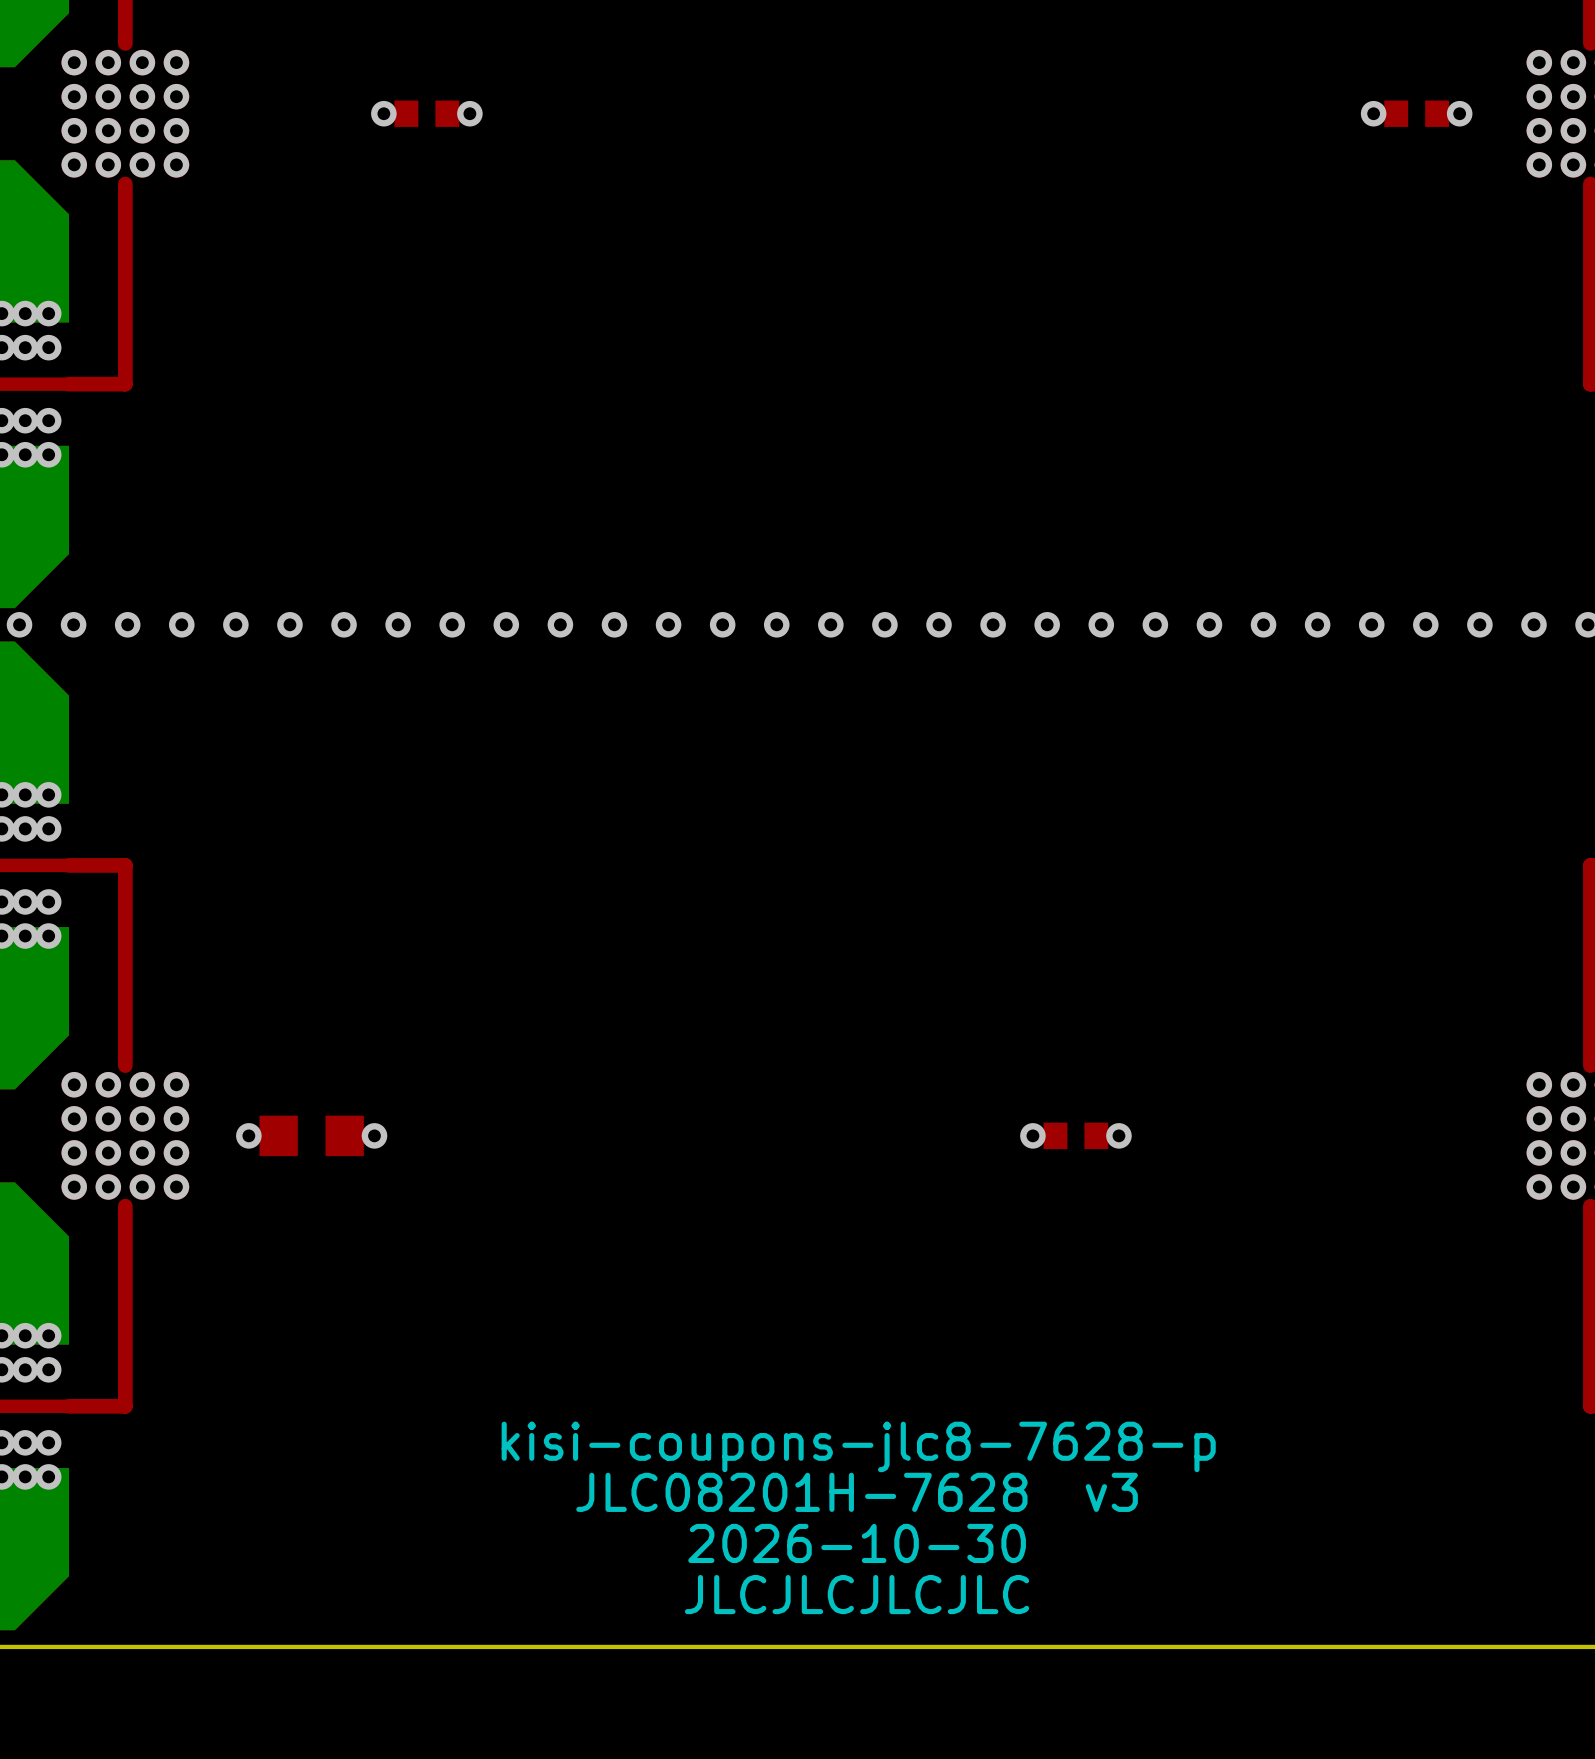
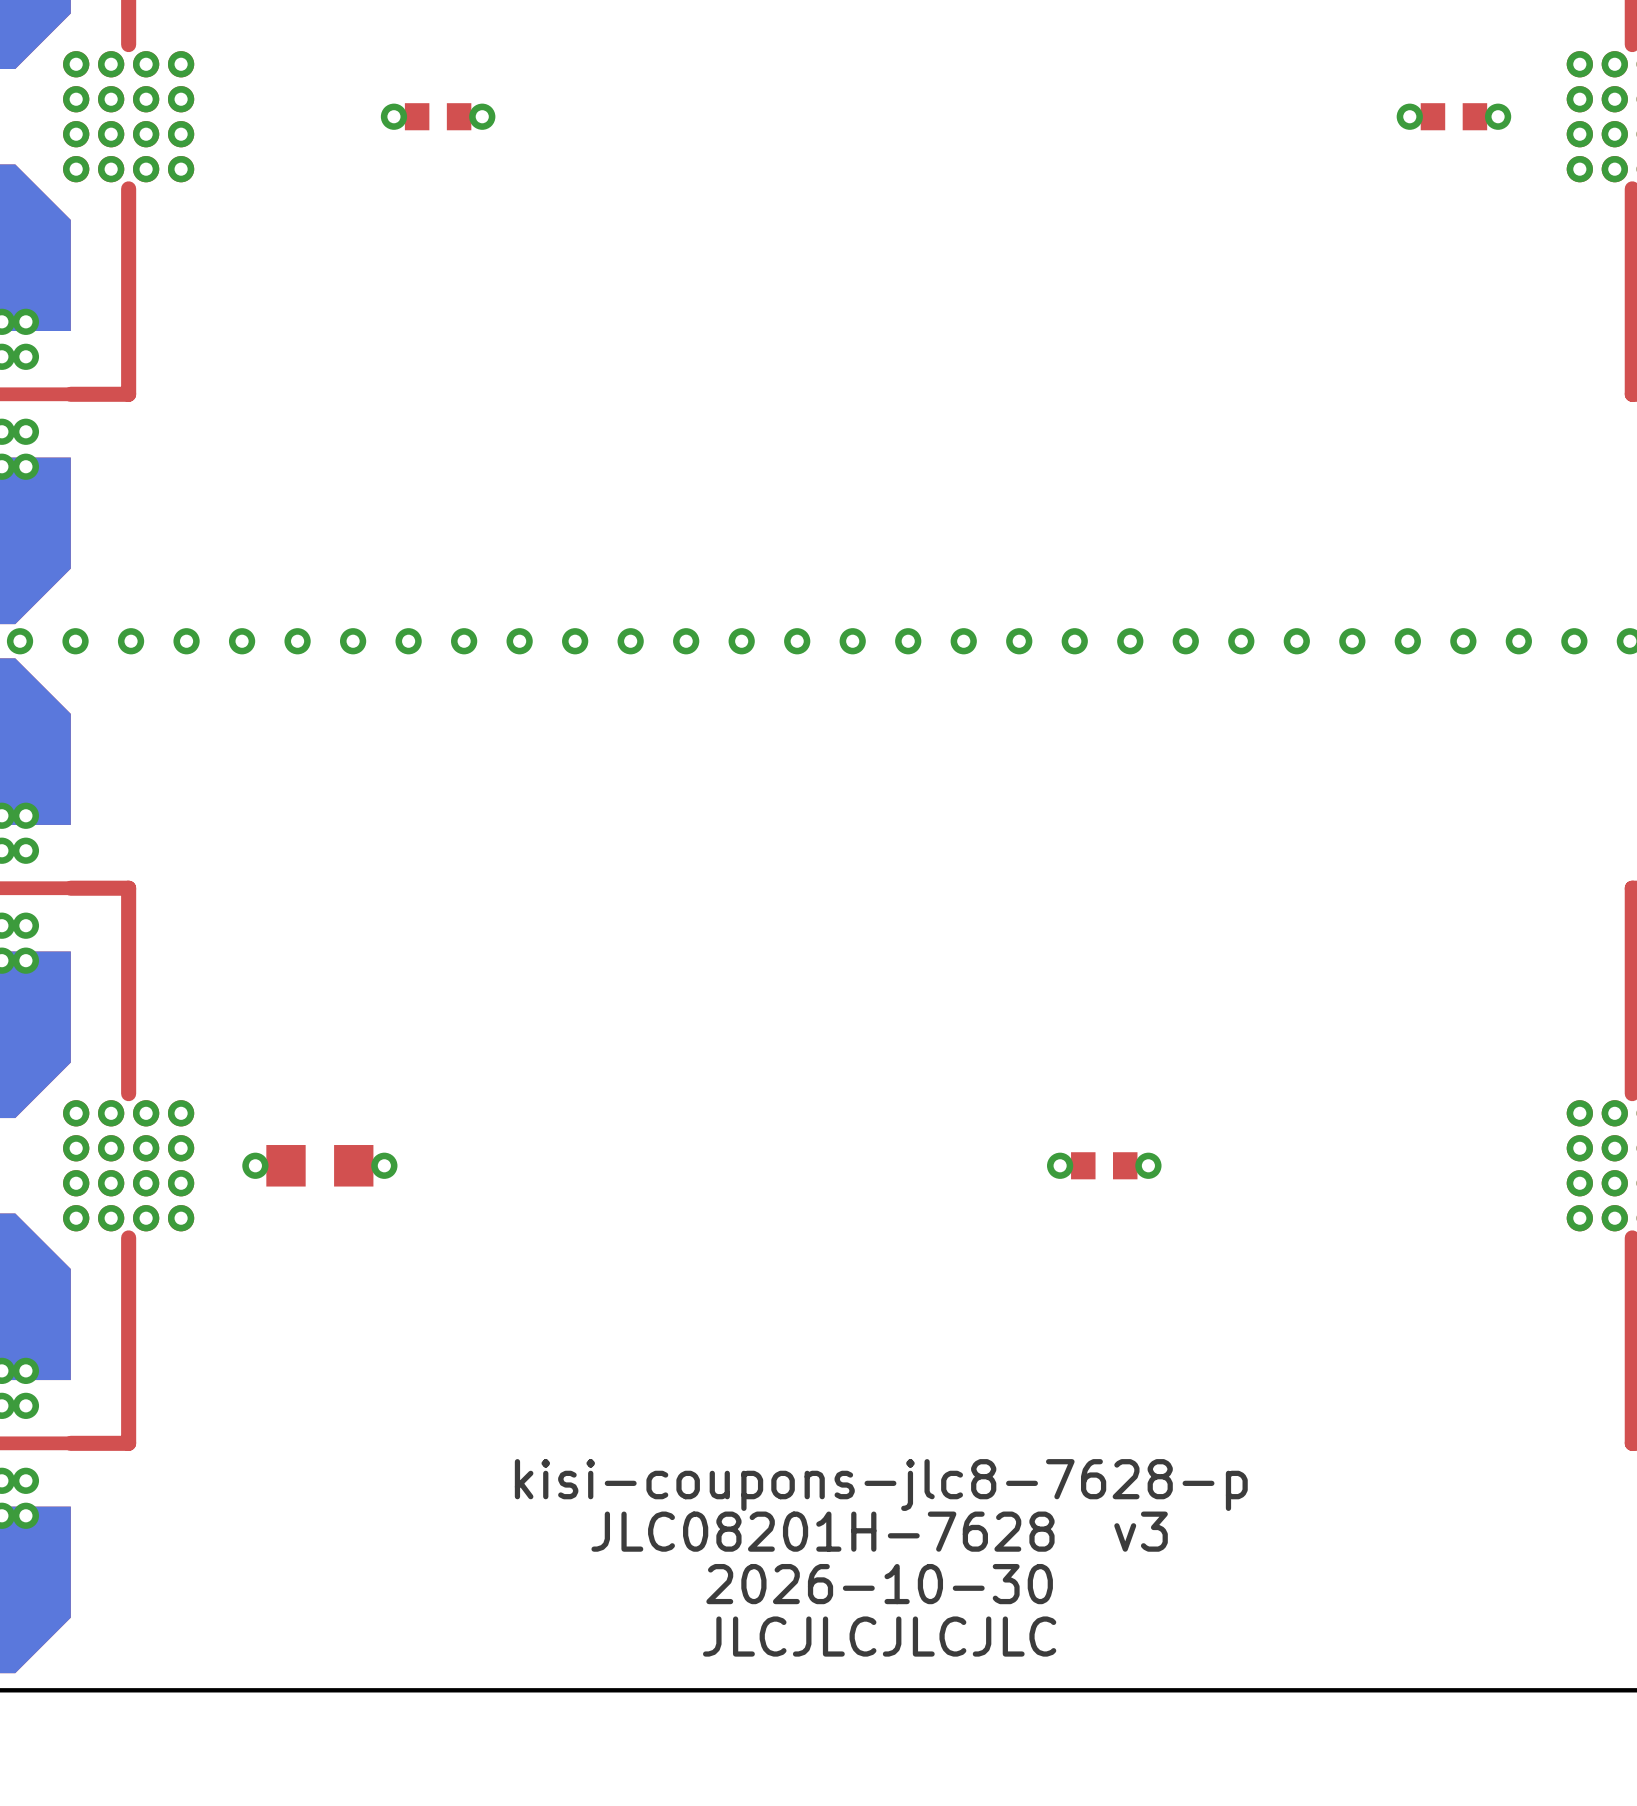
via: (48, 313) -> none
via: (48, 347) -> none
via: (48, 420) -> none
via: (48, 454) -> none
via: (48, 794) -> none
via: (48, 828) -> none
via: (48, 901) -> none
via: (48, 936) -> none
via: (48, 1335) -> none
via: (48, 1369) -> none
via: (48, 1442) -> none
via: (48, 1476) -> none

